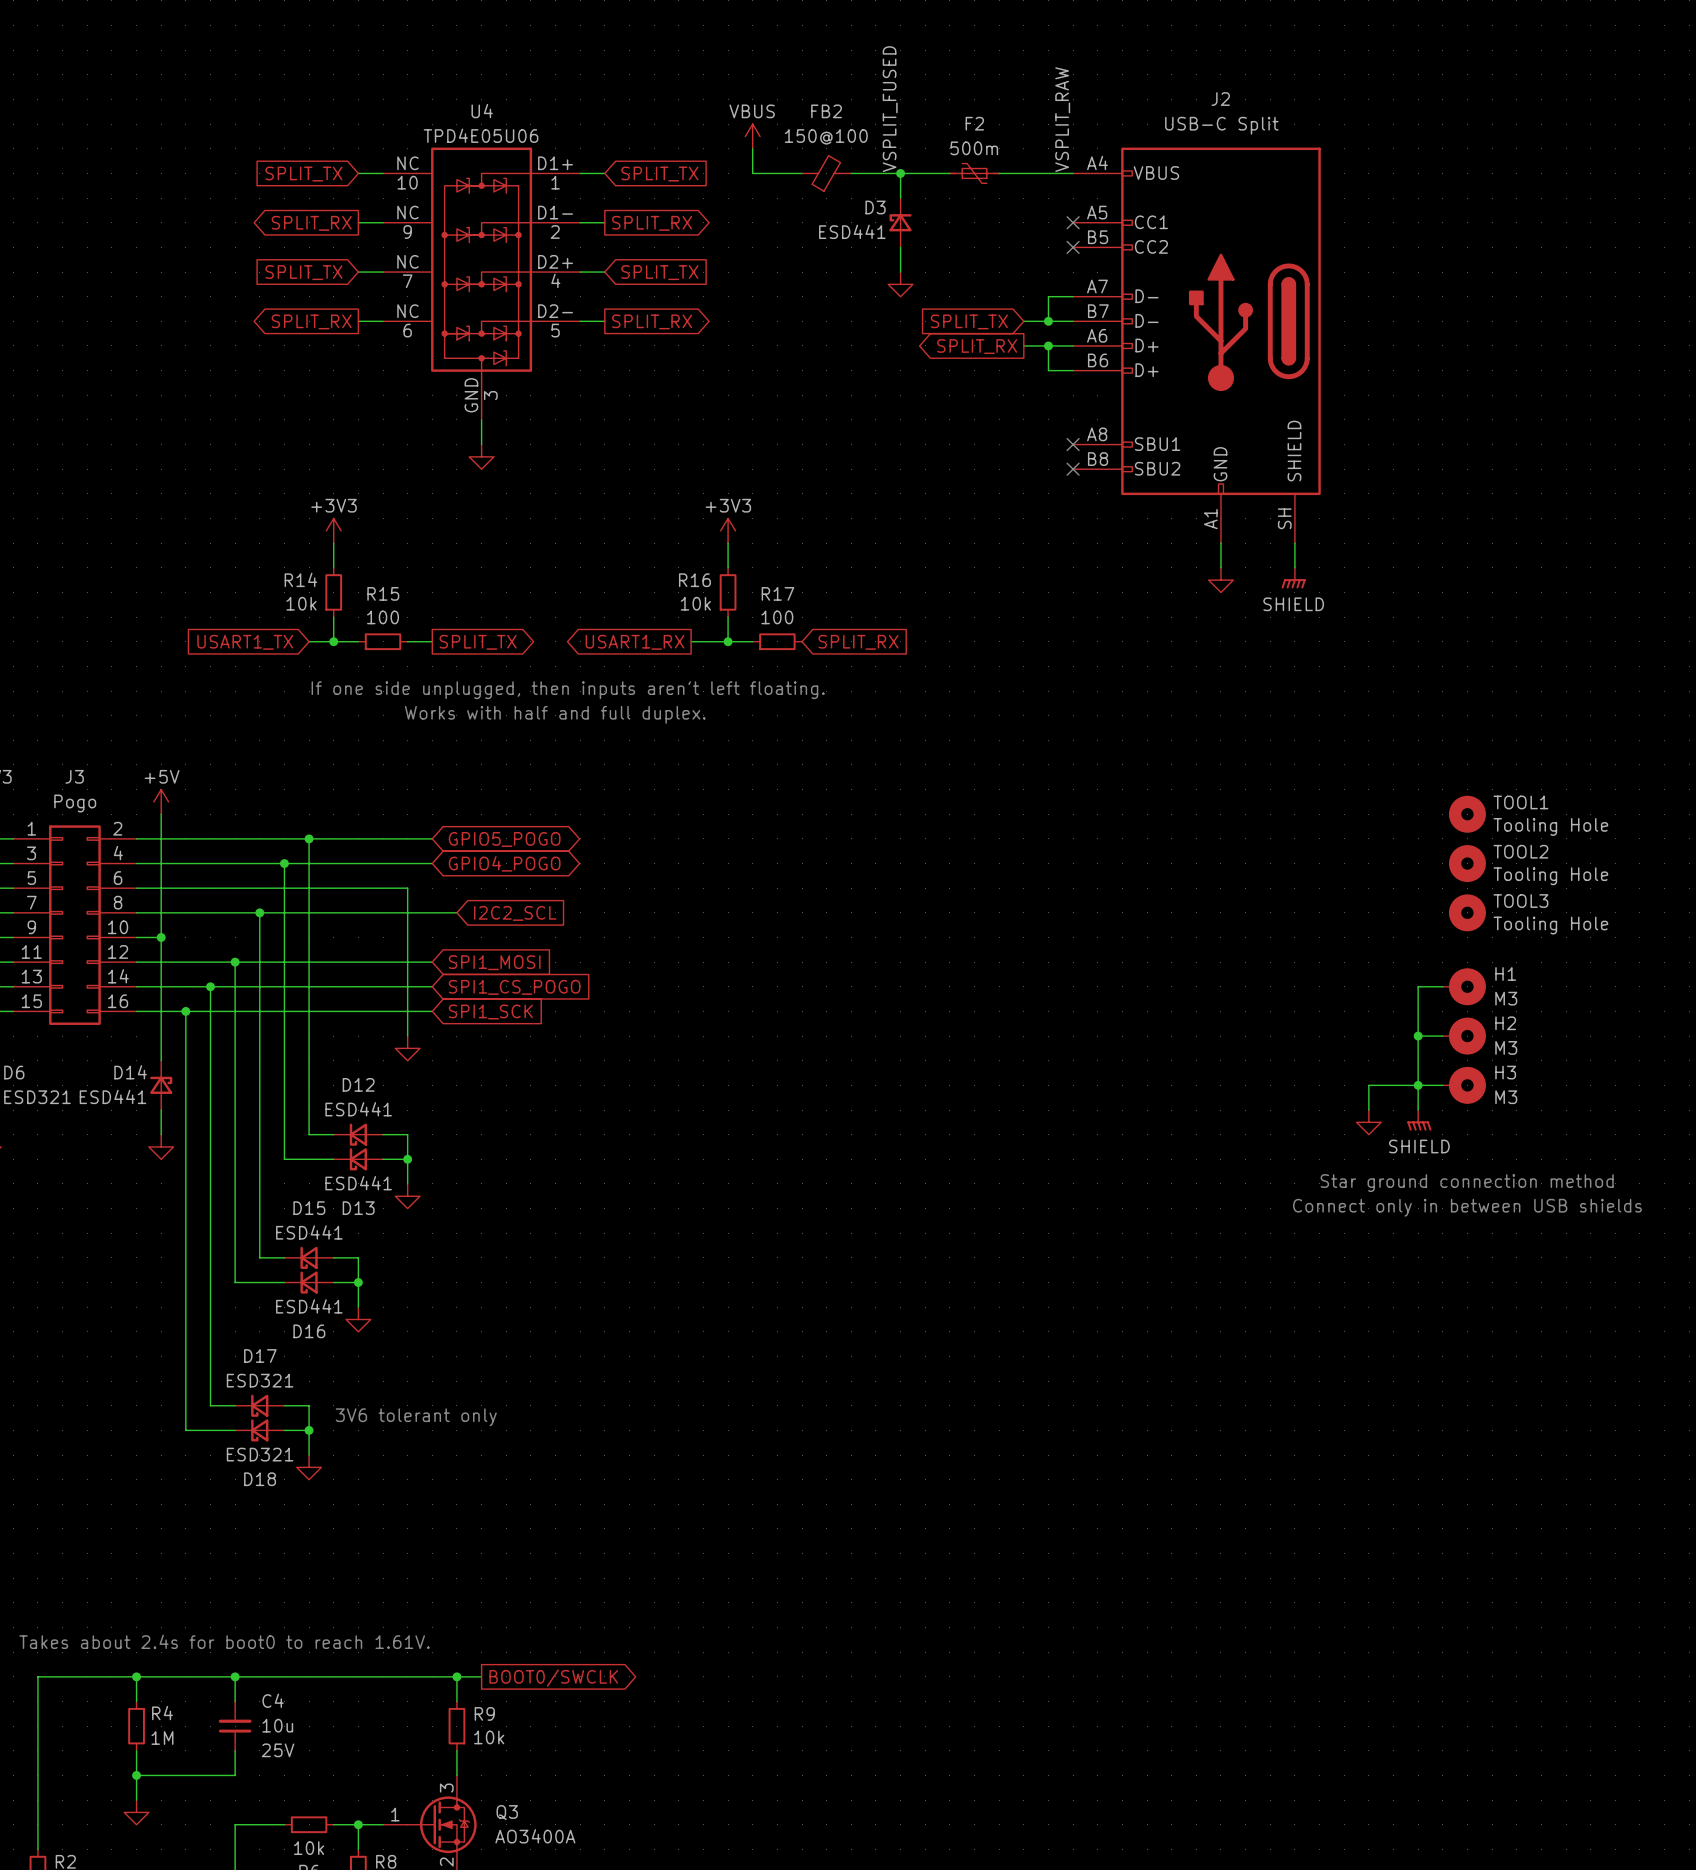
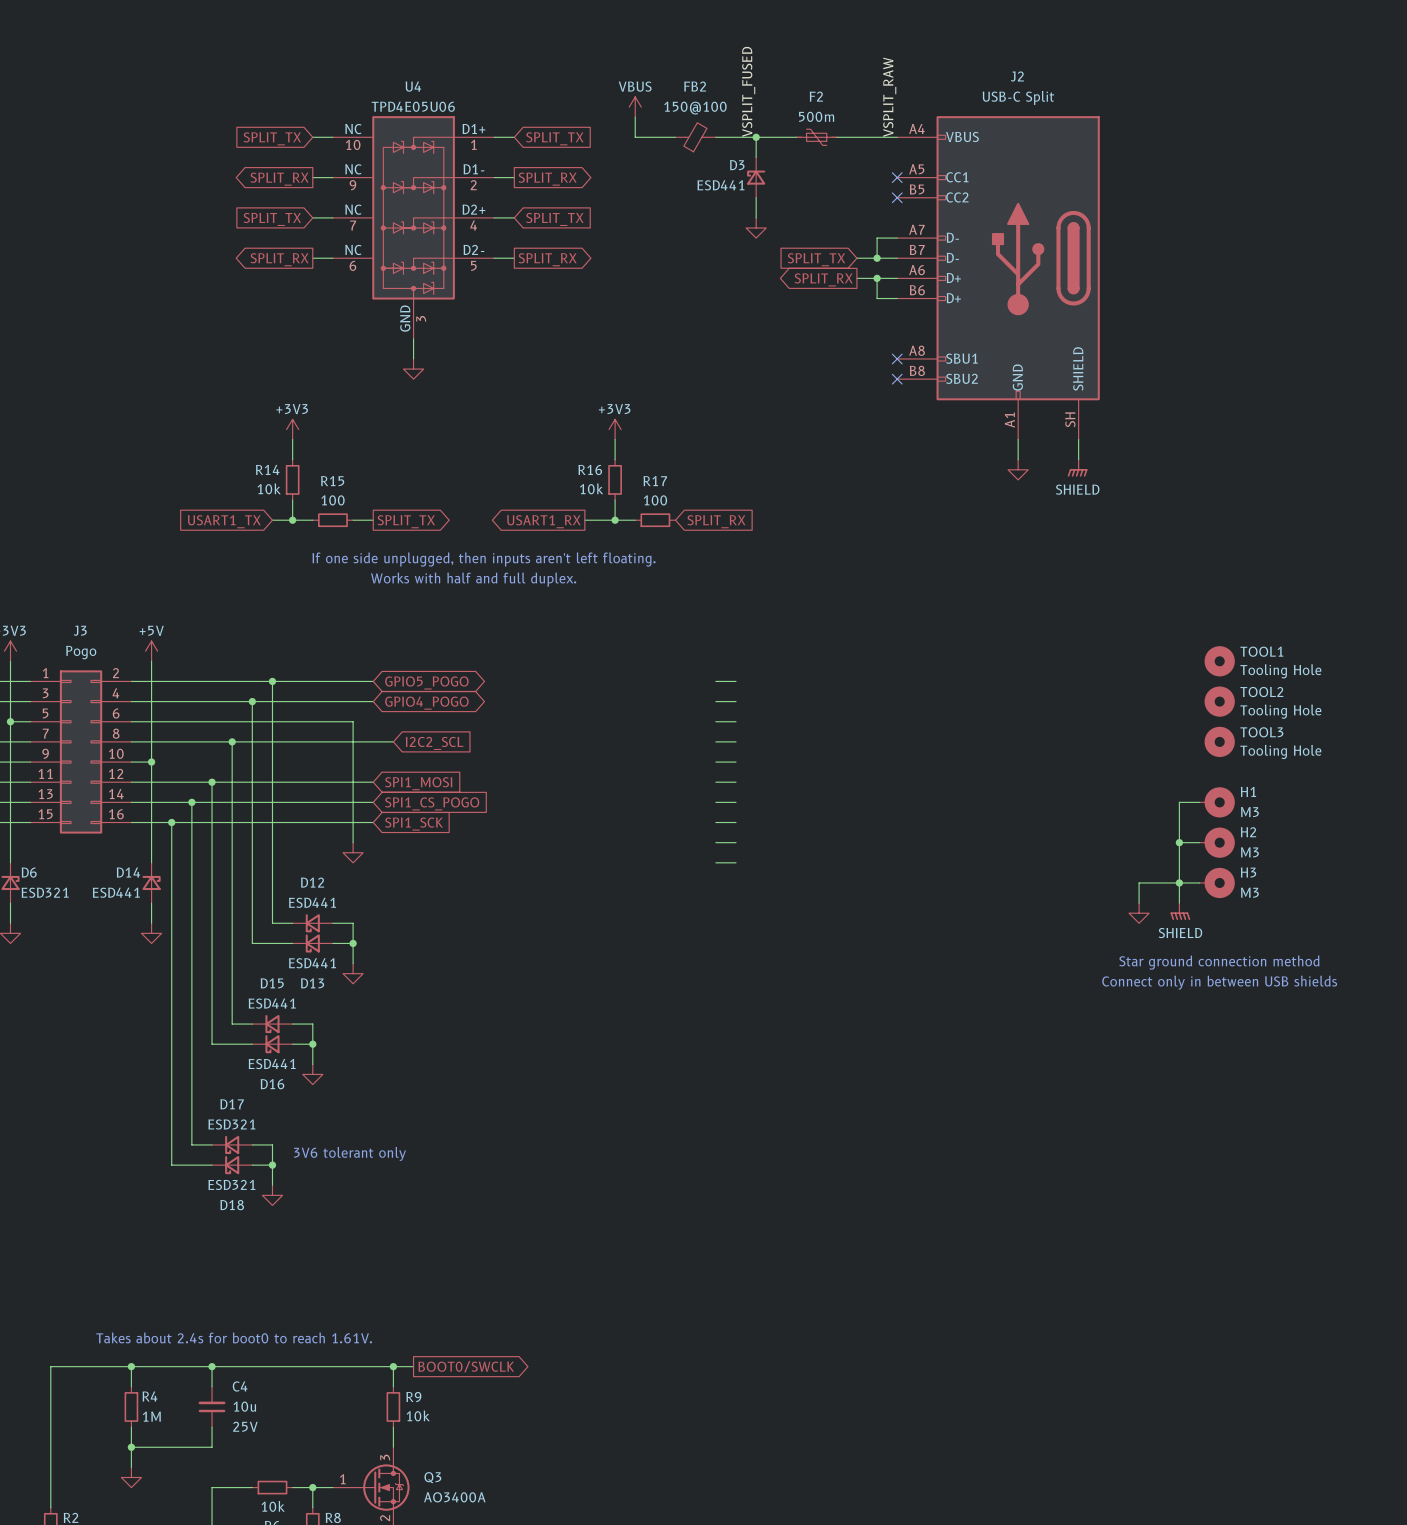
wire: none -> (715, 681) (736, 681)
wire: none -> (715, 701) (736, 701)
wire: none -> (715, 721) (736, 721)
wire: none -> (715, 741) (736, 741)
wire: none -> (715, 762) (736, 762)
wire: none -> (715, 782) (736, 782)
wire: none -> (715, 802) (736, 802)
wire: none -> (715, 822) (736, 822)
wire: none -> (715, 842) (736, 842)
wire: none -> (715, 862) (736, 862)

